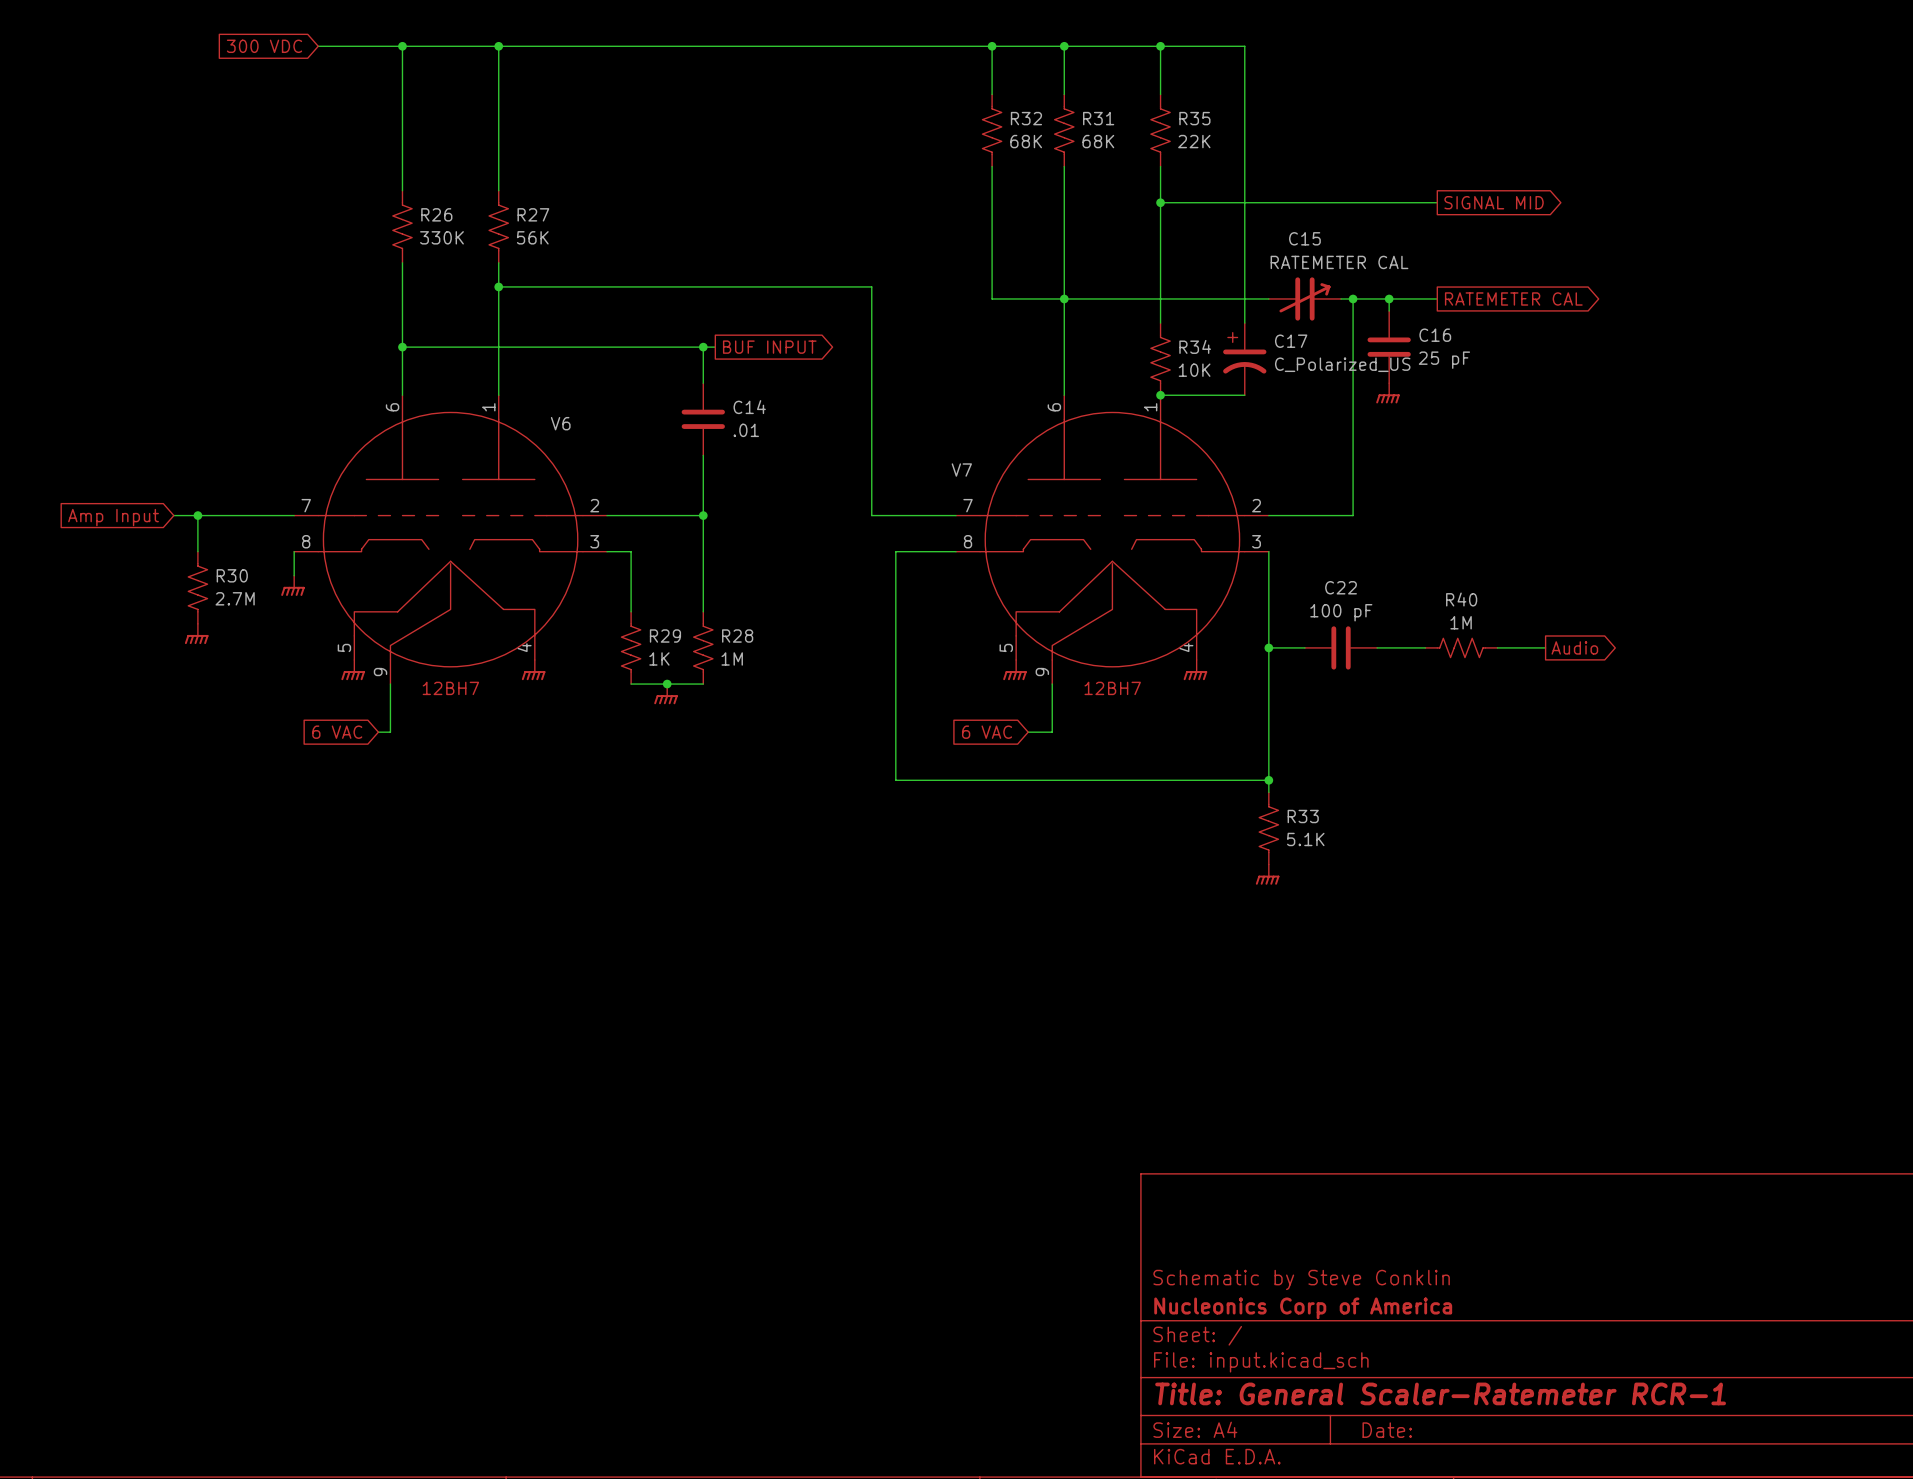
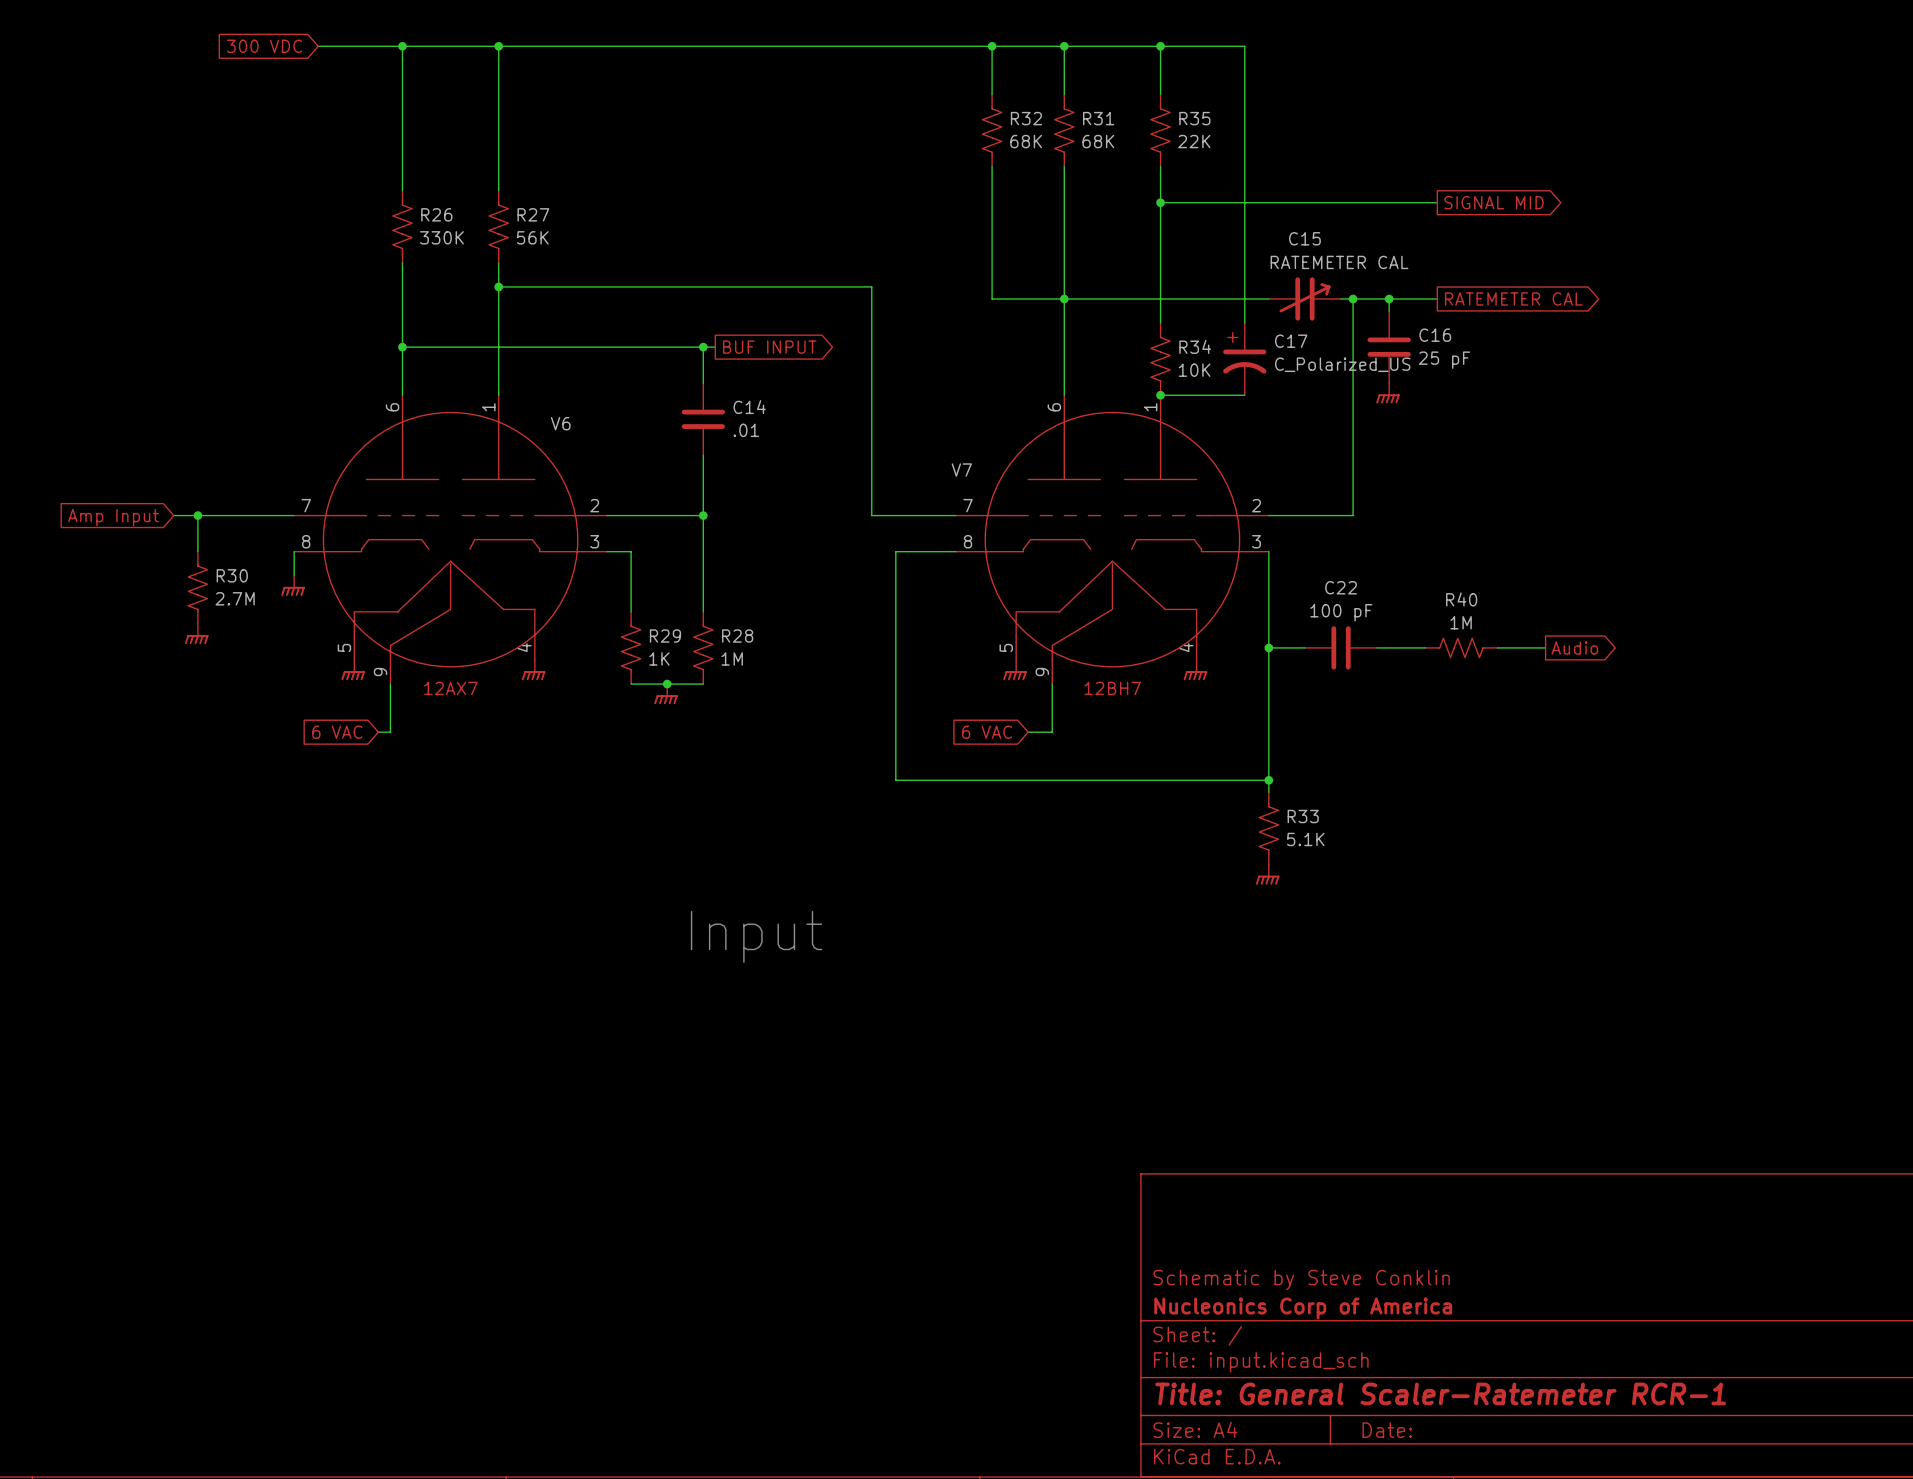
V6 text: 12BH7 (450, 688) -> 12AX7 (450, 688)
text: none -> Input (756, 936)

